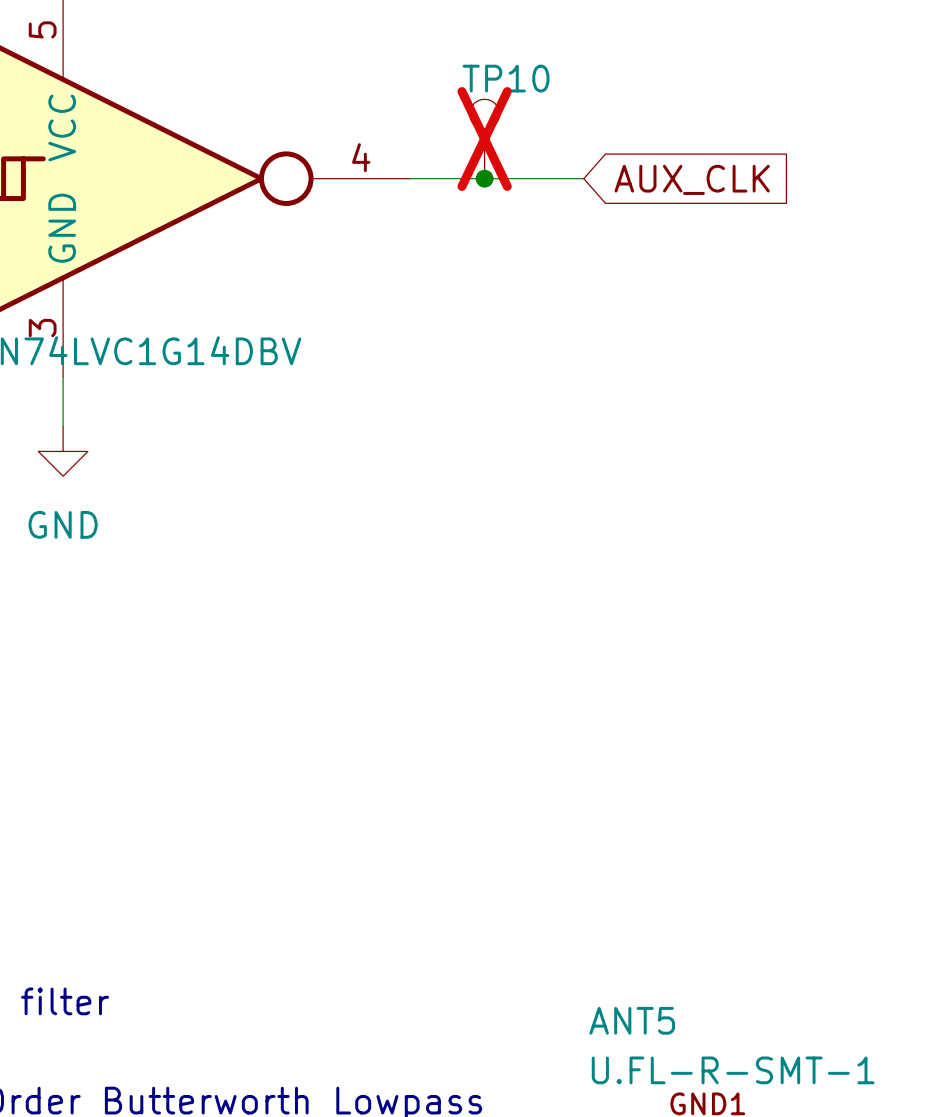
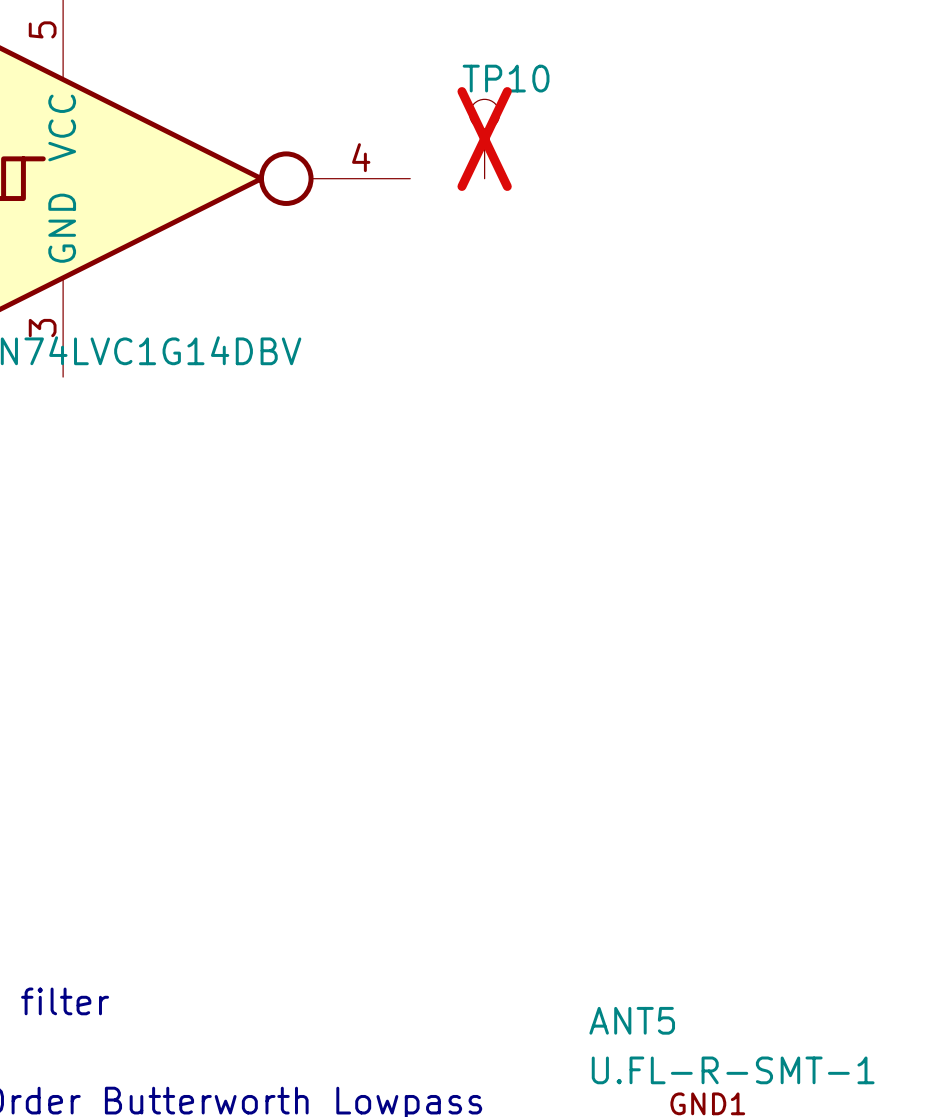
wire: (410, 178) (583, 178) -> none
junction: (484, 178) -> none
global label: AUX_CLK (692, 179) -> none
wire: (63, 377) (63, 426) -> none
power symbol: GND (63, 451) -> none

